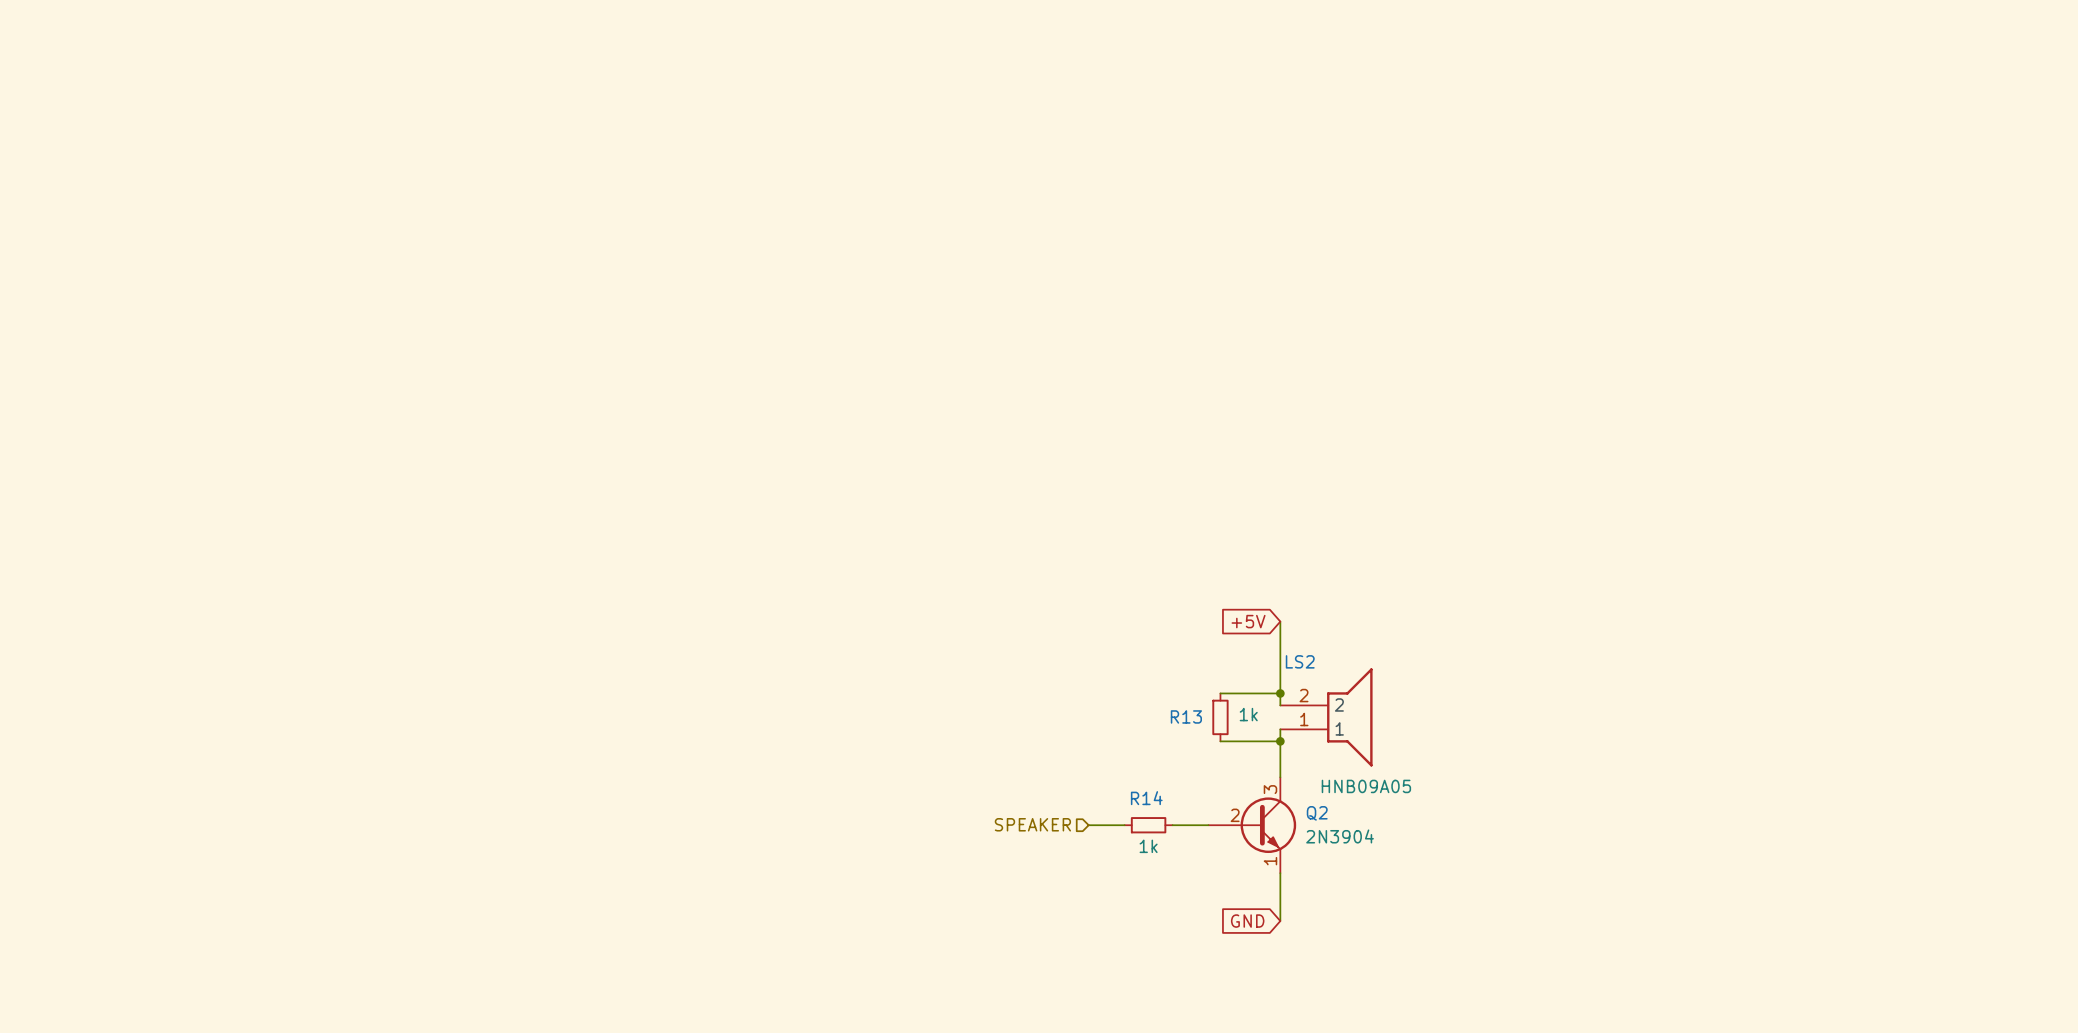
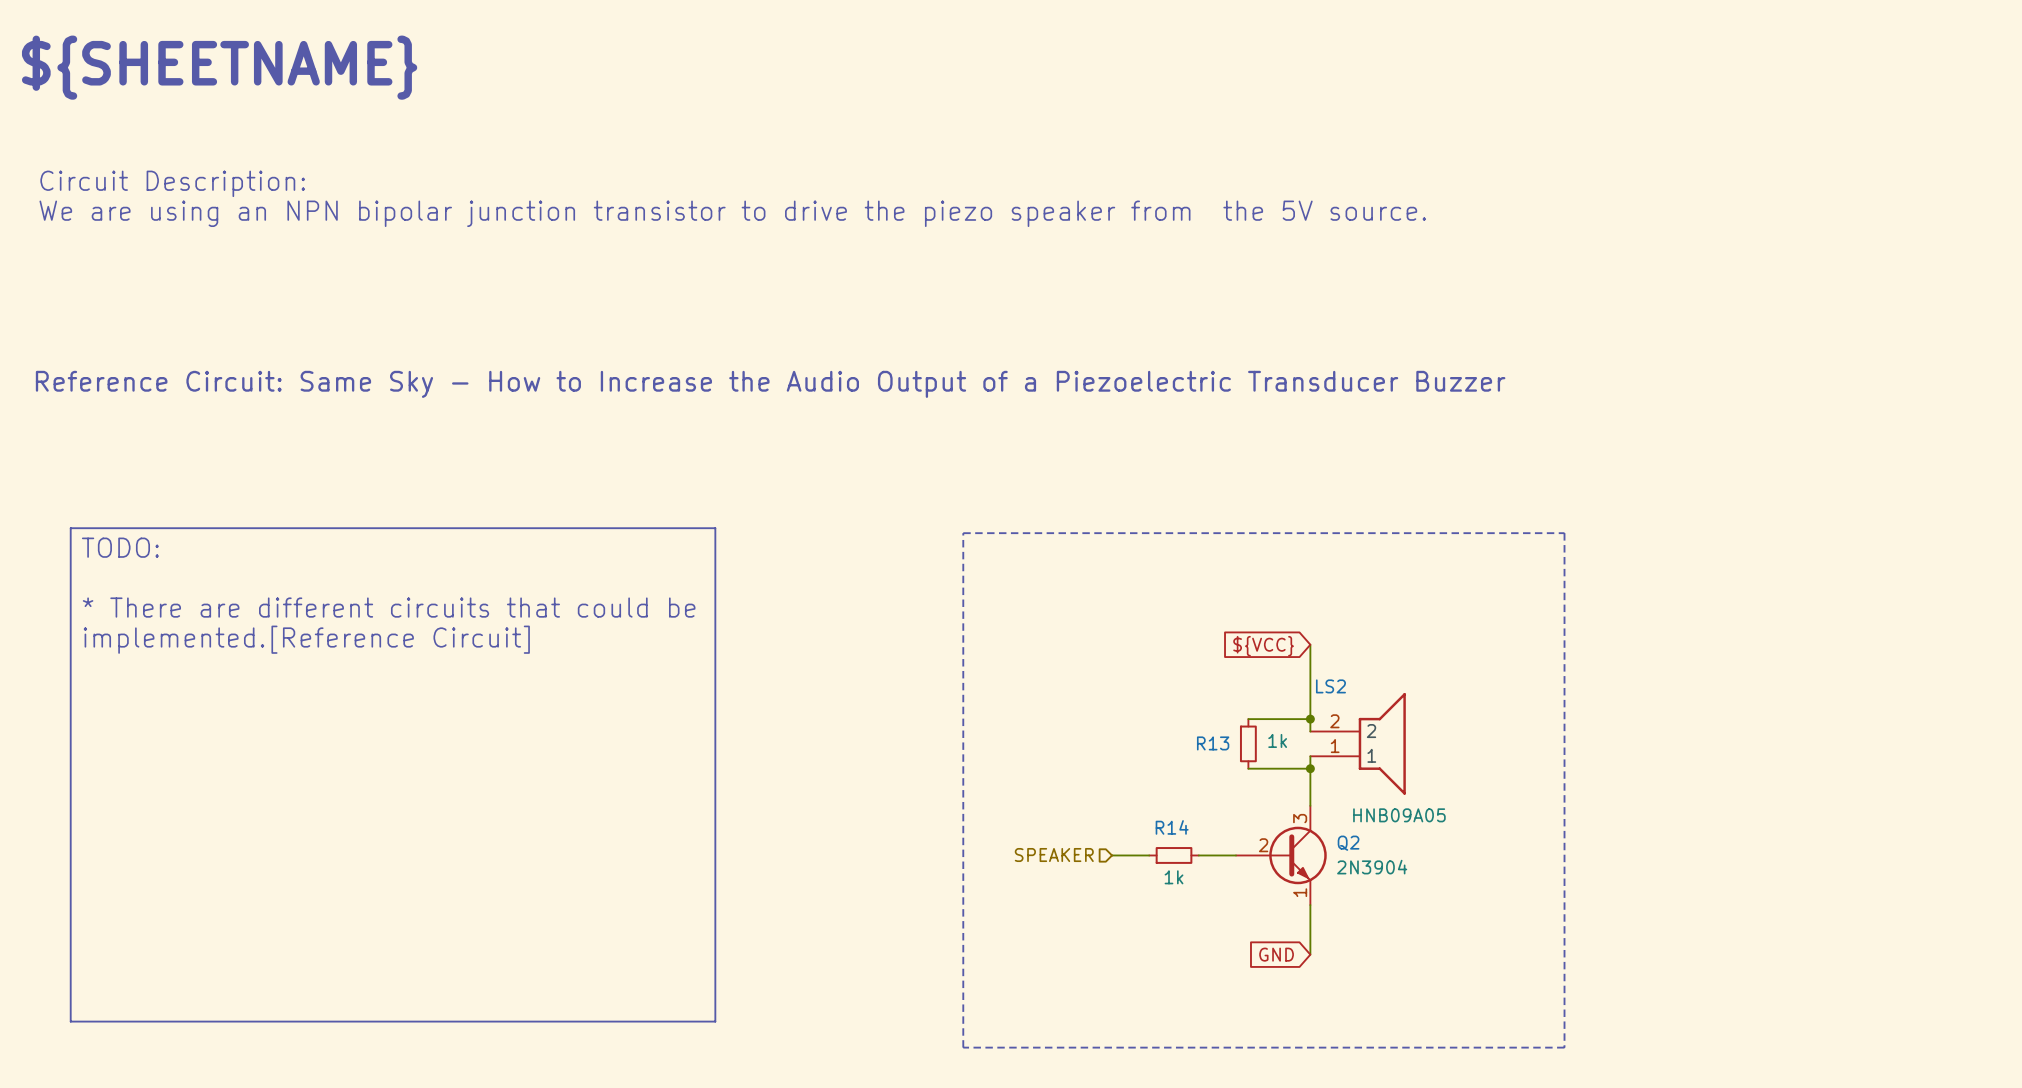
text: none -> ${SHEETNAME} (219, 67)
text: none -> Circuit Description: (172, 183)
text: none -> We are using an NPN bipolar junction transistor to drive the piezo speaker from the 5V source. (732, 213)
text: none -> Reference Circuit: Same Sky - How to Increase the Audio Output of a Piezoelectric Transducer Buzzer (770, 384)
line: none -> (70, 528) (715, 528) (715, 1021) (70, 1021) (70, 528)
line: none -> (963, 533) (1564, 533) (1564, 1047) (963, 1047) (963, 533)
text: none -> TODO: (120, 547)
text: none -> * There are different circuits that could be (389, 607)
text: none -> implemented.[Reference Circuit] (306, 639)
global label: +5V (1248, 621) -> ${VCC} (1263, 646)

